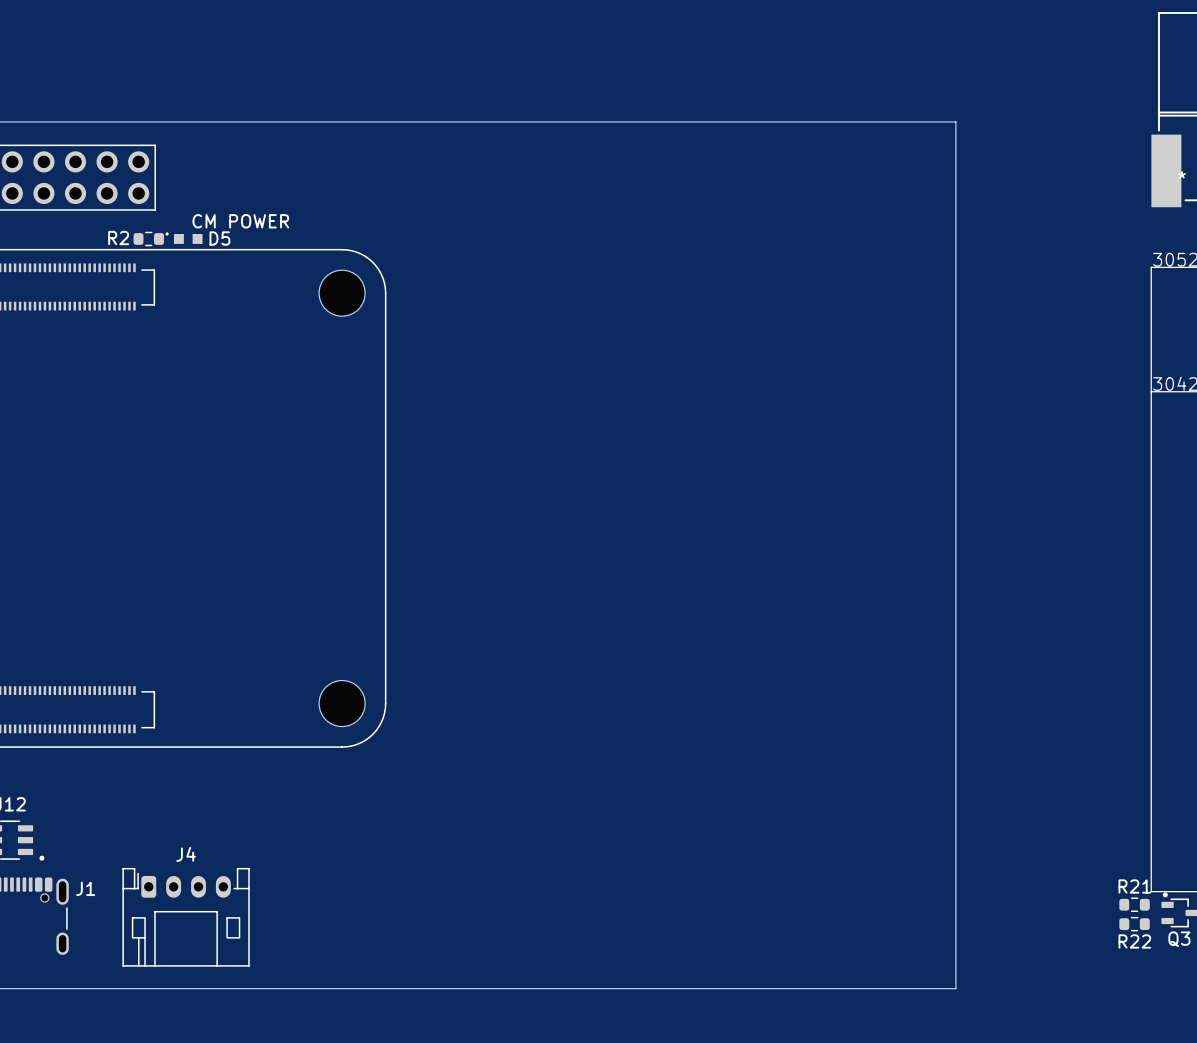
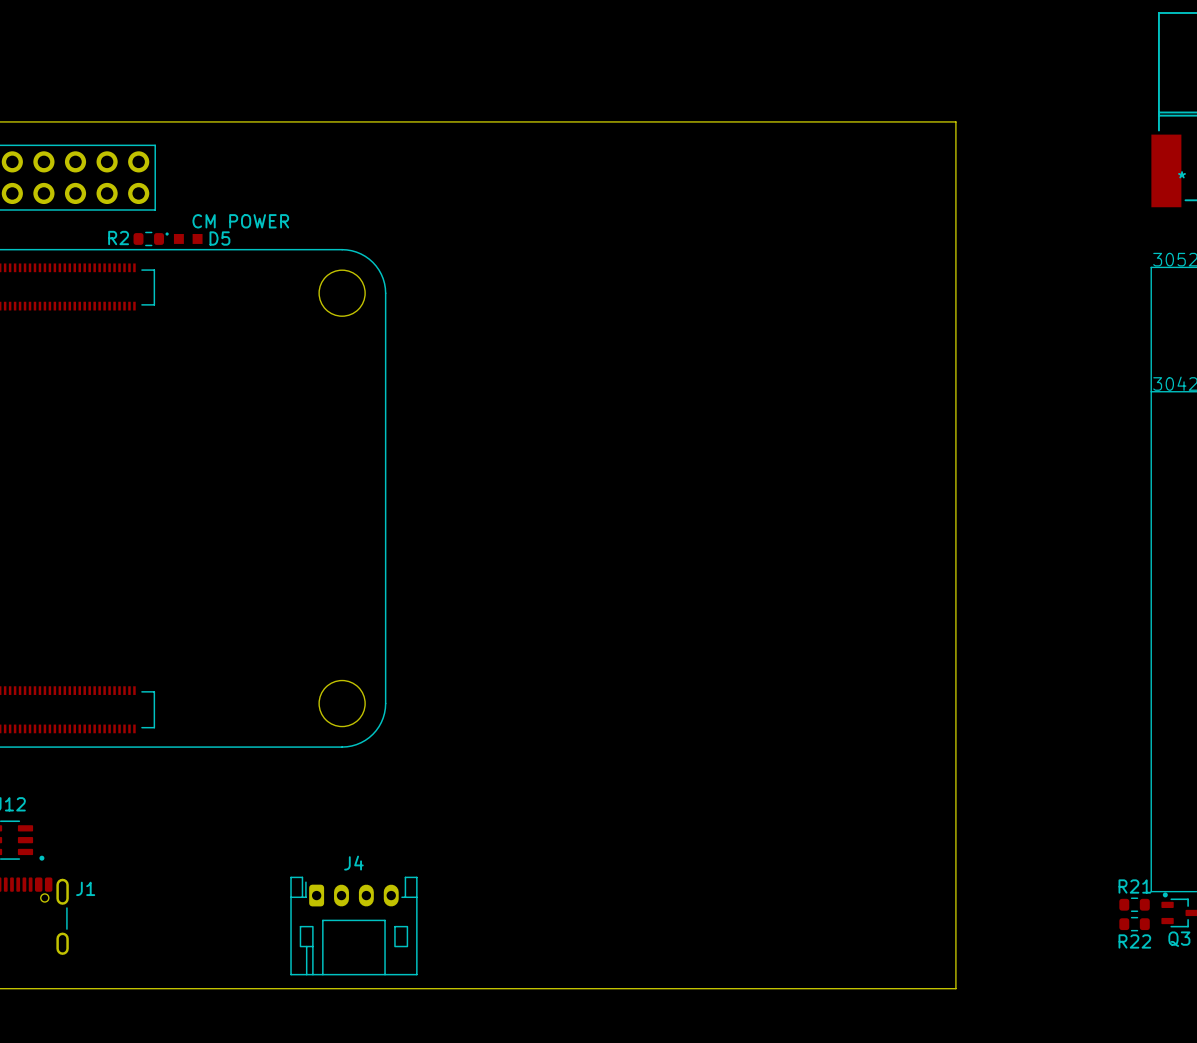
J4 position: (186, 917) -> (353, 926)

